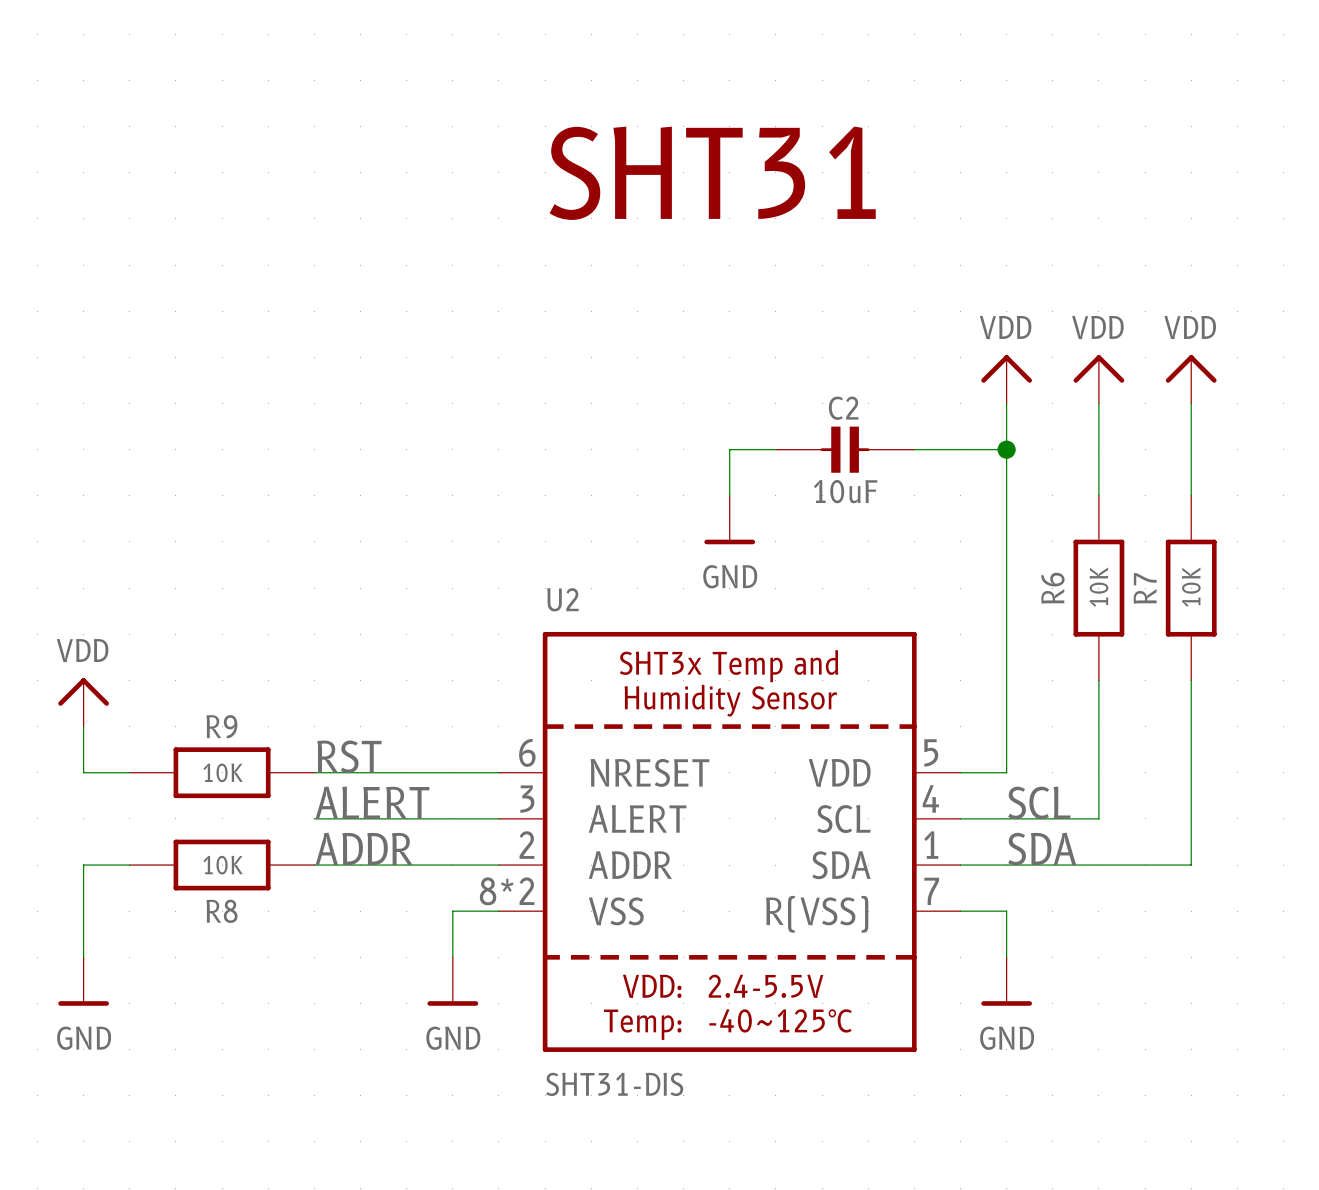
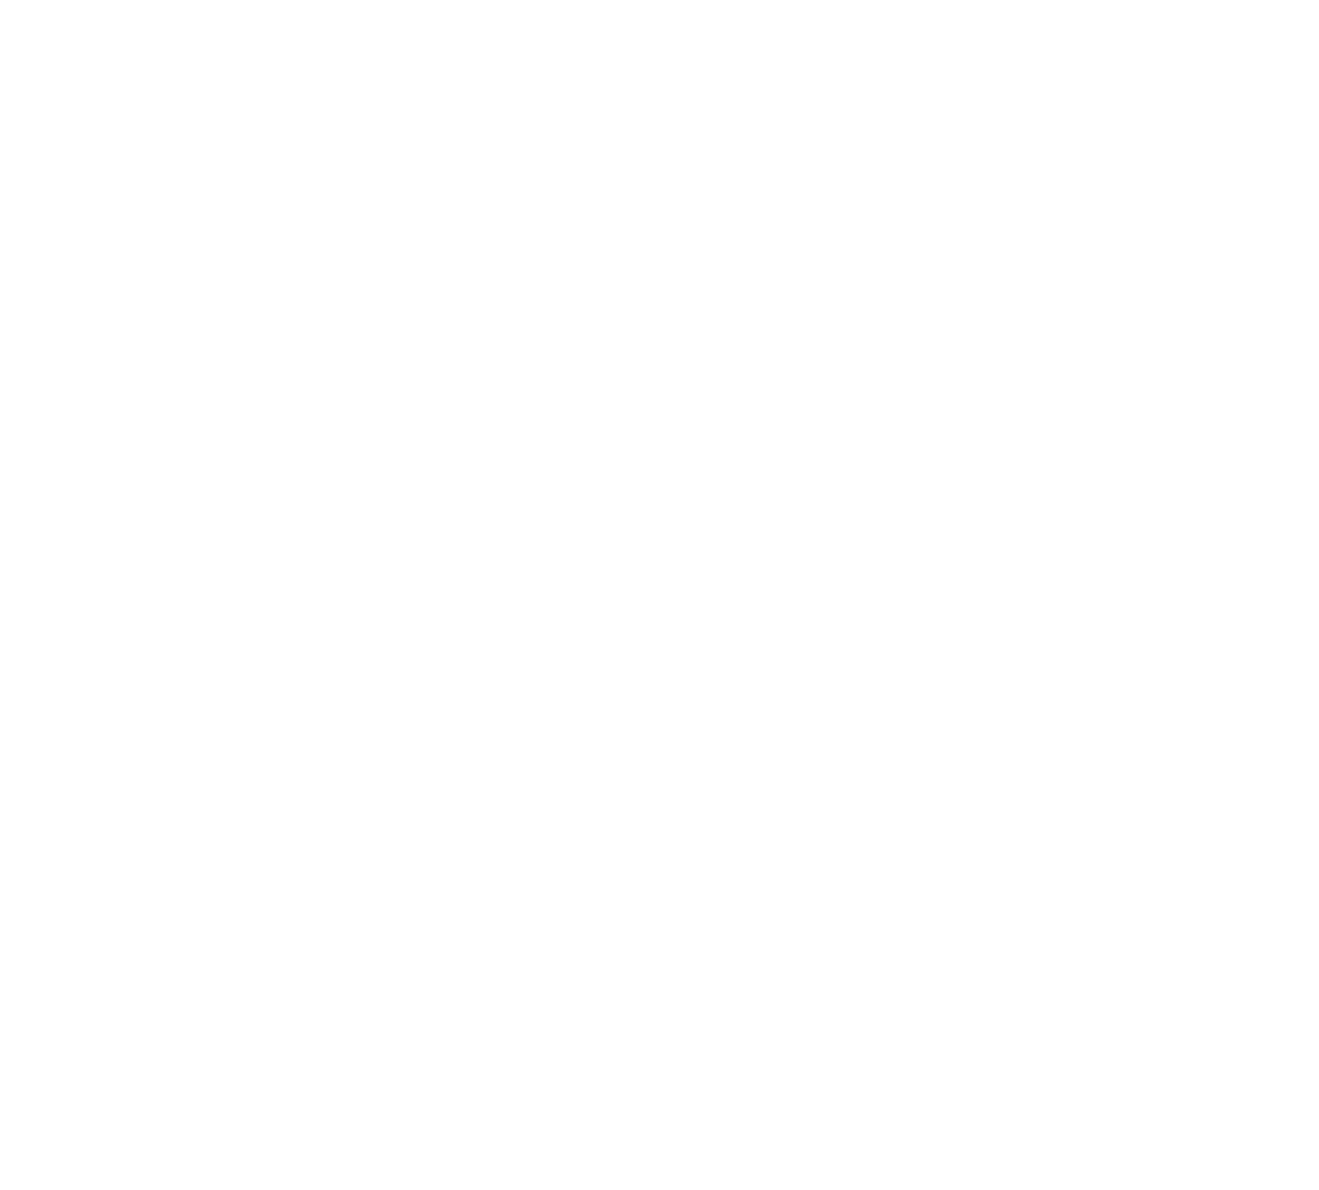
text: SHT31 (712, 173) -> none
power symbol: VDD (1006, 379) -> none
power symbol: VDD (1098, 379) -> none
power symbol: VDD (1191, 379) -> none
wire: (1006, 403) (1006, 772) (960, 772) -> none
wire: (1098, 403) (1098, 495) -> none
wire: (1191, 403) (1191, 495) -> none
wire: (775, 449) (729, 449) (729, 495) -> none
C2: 10uF (845, 449) -> none
wire: (914, 449) (1006, 449) -> none
junction: (1006, 449) -> none
power symbol: GND (729, 520) -> none
R6: 10K (1098, 588) -> none
R7: 10K (1191, 588) -> none
wire: (1098, 680) (1098, 818) (960, 818) -> none
wire: (1191, 680) (1191, 865) (960, 865) -> none
power symbol: VDD (83, 702) -> none
wire: (83, 726) (83, 772) (129, 772) -> none
label: RST (349, 756) -> none
R9: 10K (222, 772) -> none
wire: (314, 772) (498, 772) -> none
label: ALERT (372, 802) -> none
label: SCL (1039, 802) -> none
wire: (314, 818) (498, 818) -> none
U2: SHT31-DIS (729, 841) -> none
label: ADDR (364, 848) -> none
label: SDA (1042, 849) -> none
wire: (129, 865) (83, 865) (83, 957) -> none
R8: 10K (222, 865) -> none
wire: (314, 865) (498, 865) -> none
wire: (498, 911) (452, 911) (452, 957) -> none
wire: (960, 911) (1006, 911) (1006, 957) -> none
power symbol: GND (83, 981) -> none
power symbol: GND (452, 981) -> none
power symbol: GND (1006, 981) -> none

